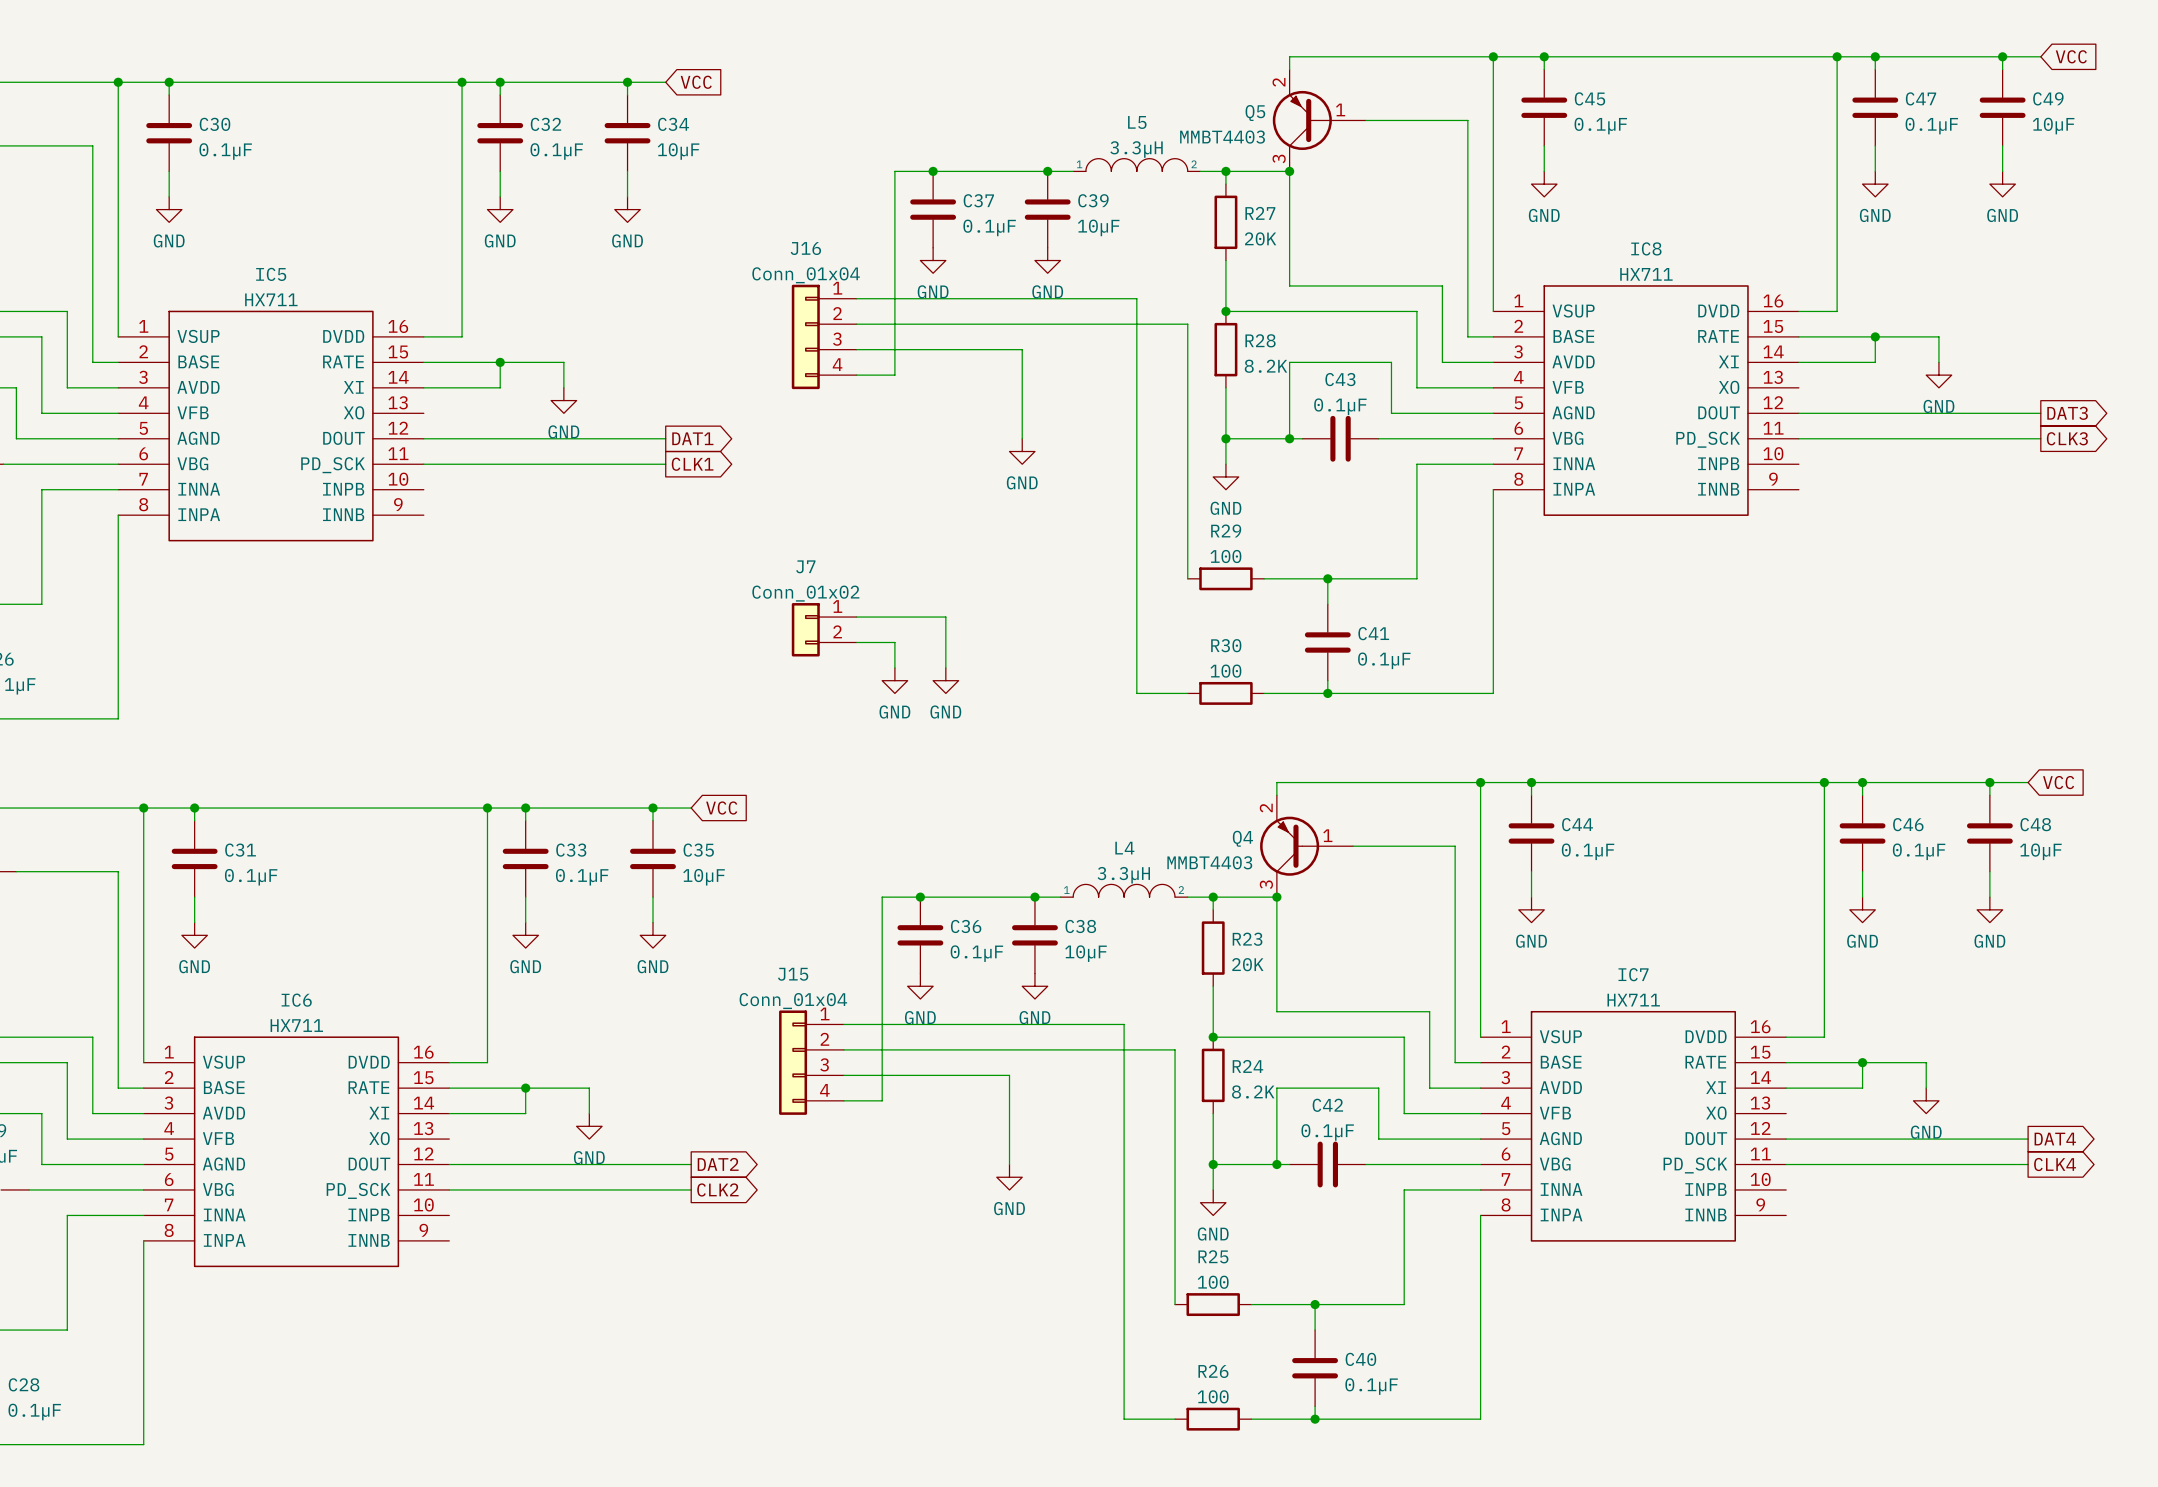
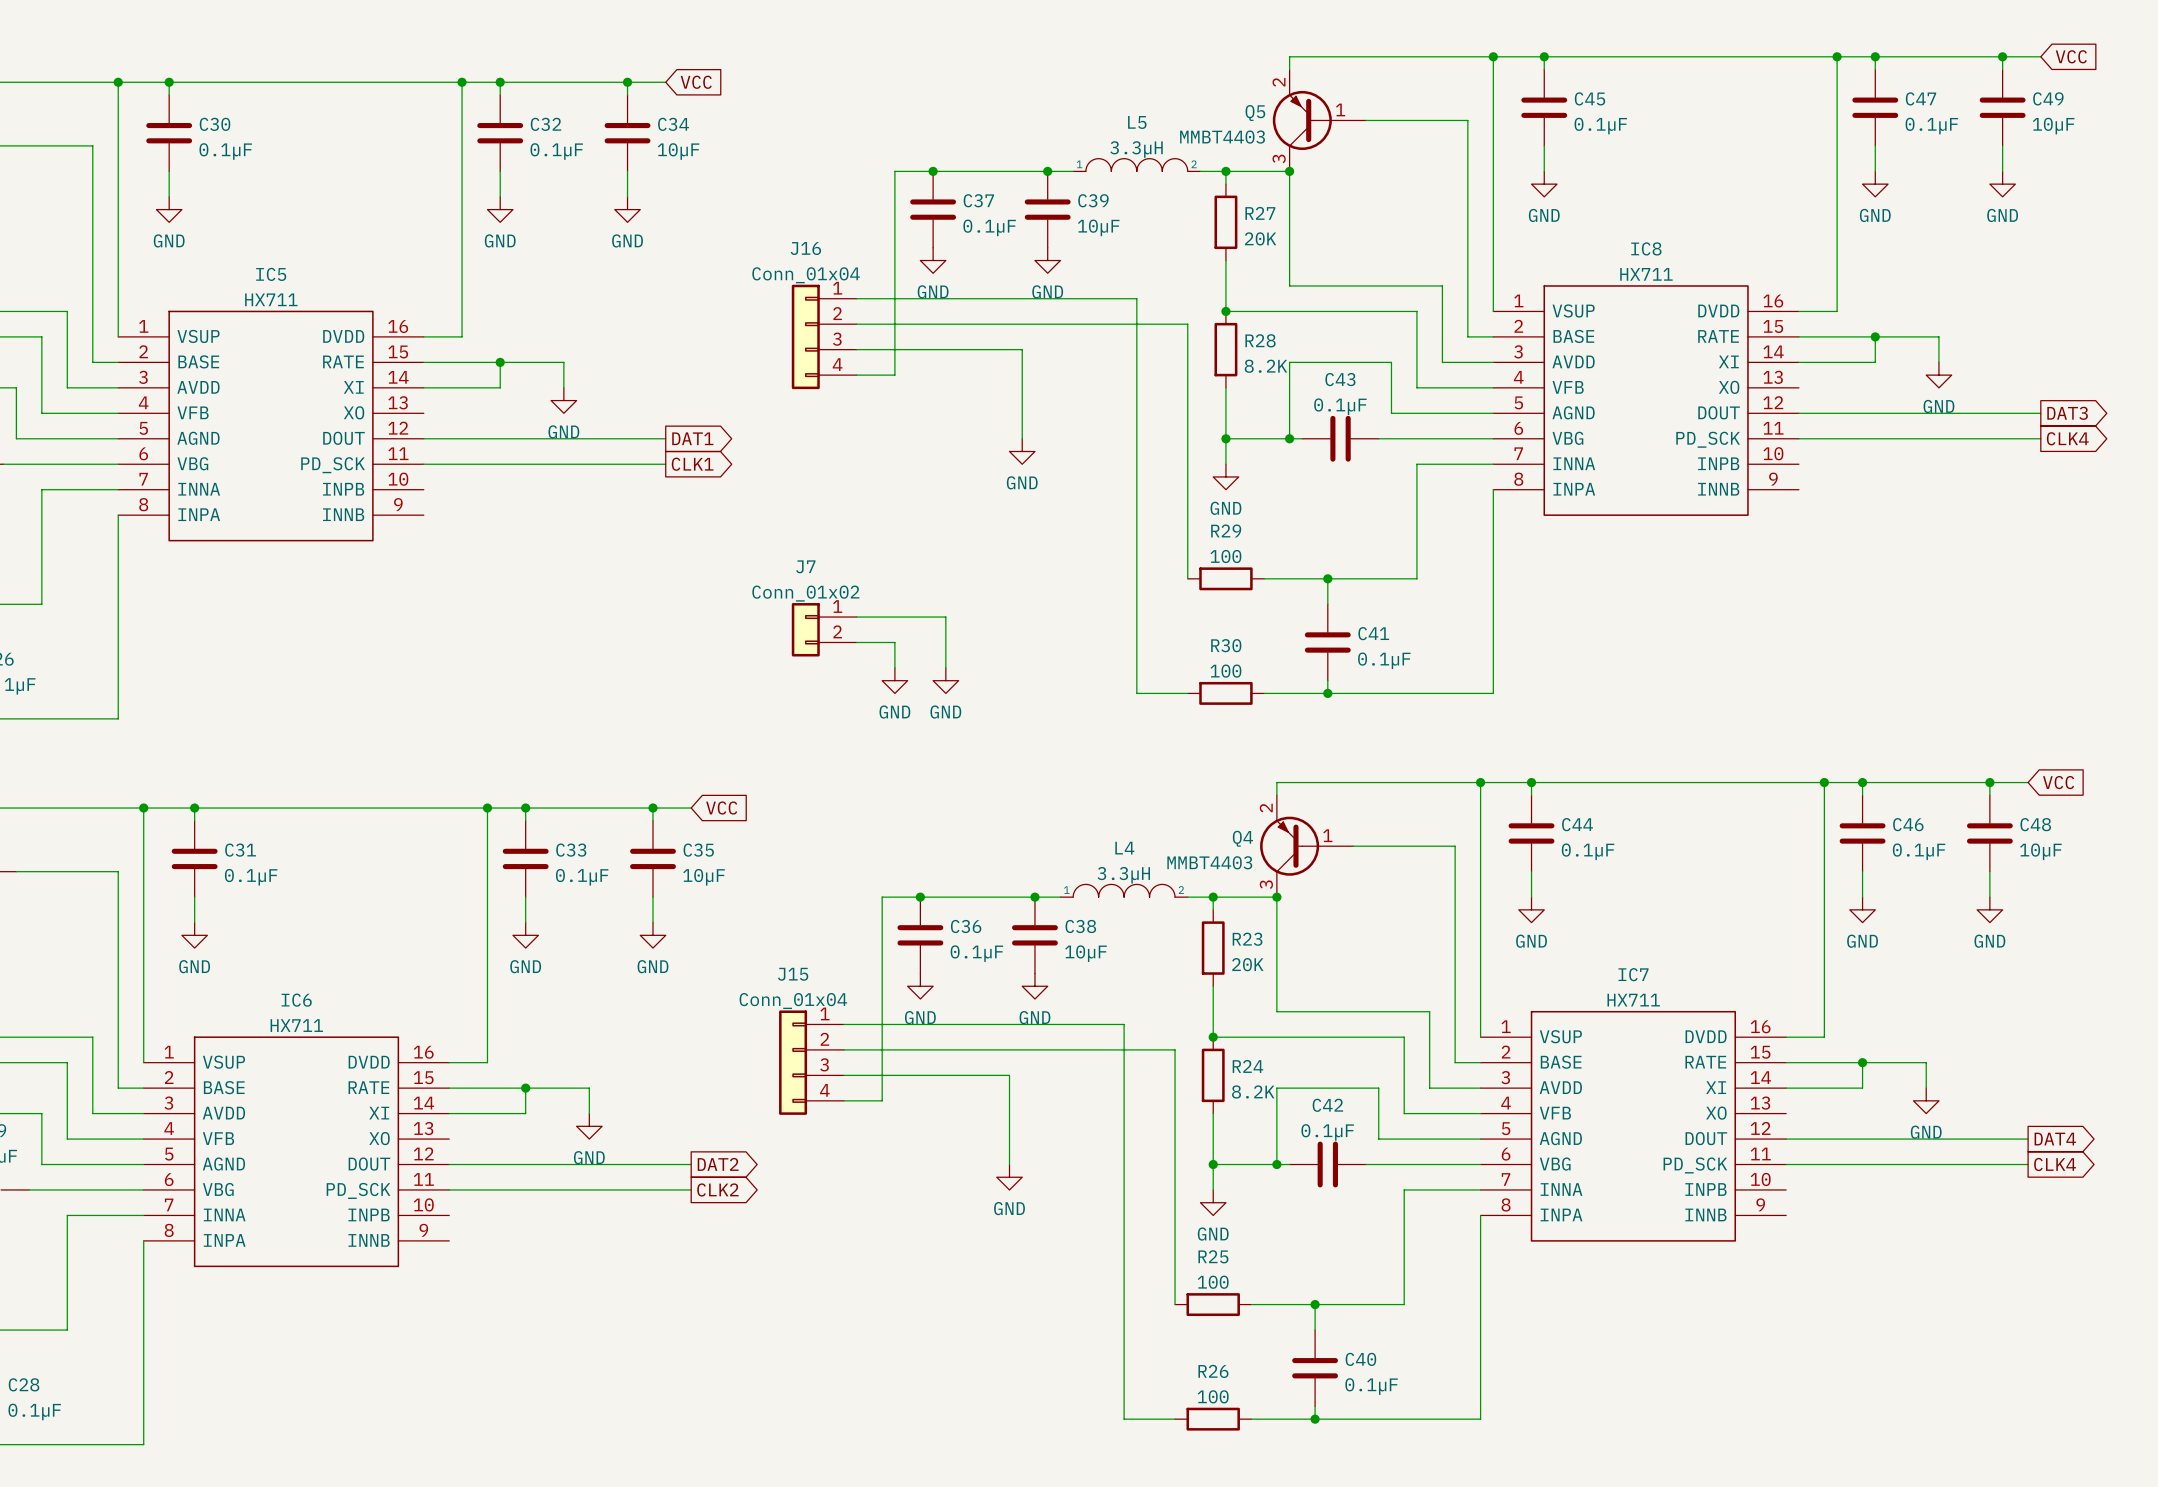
global label: CLK3 (2067, 438) -> CLK4 (2067, 438)

